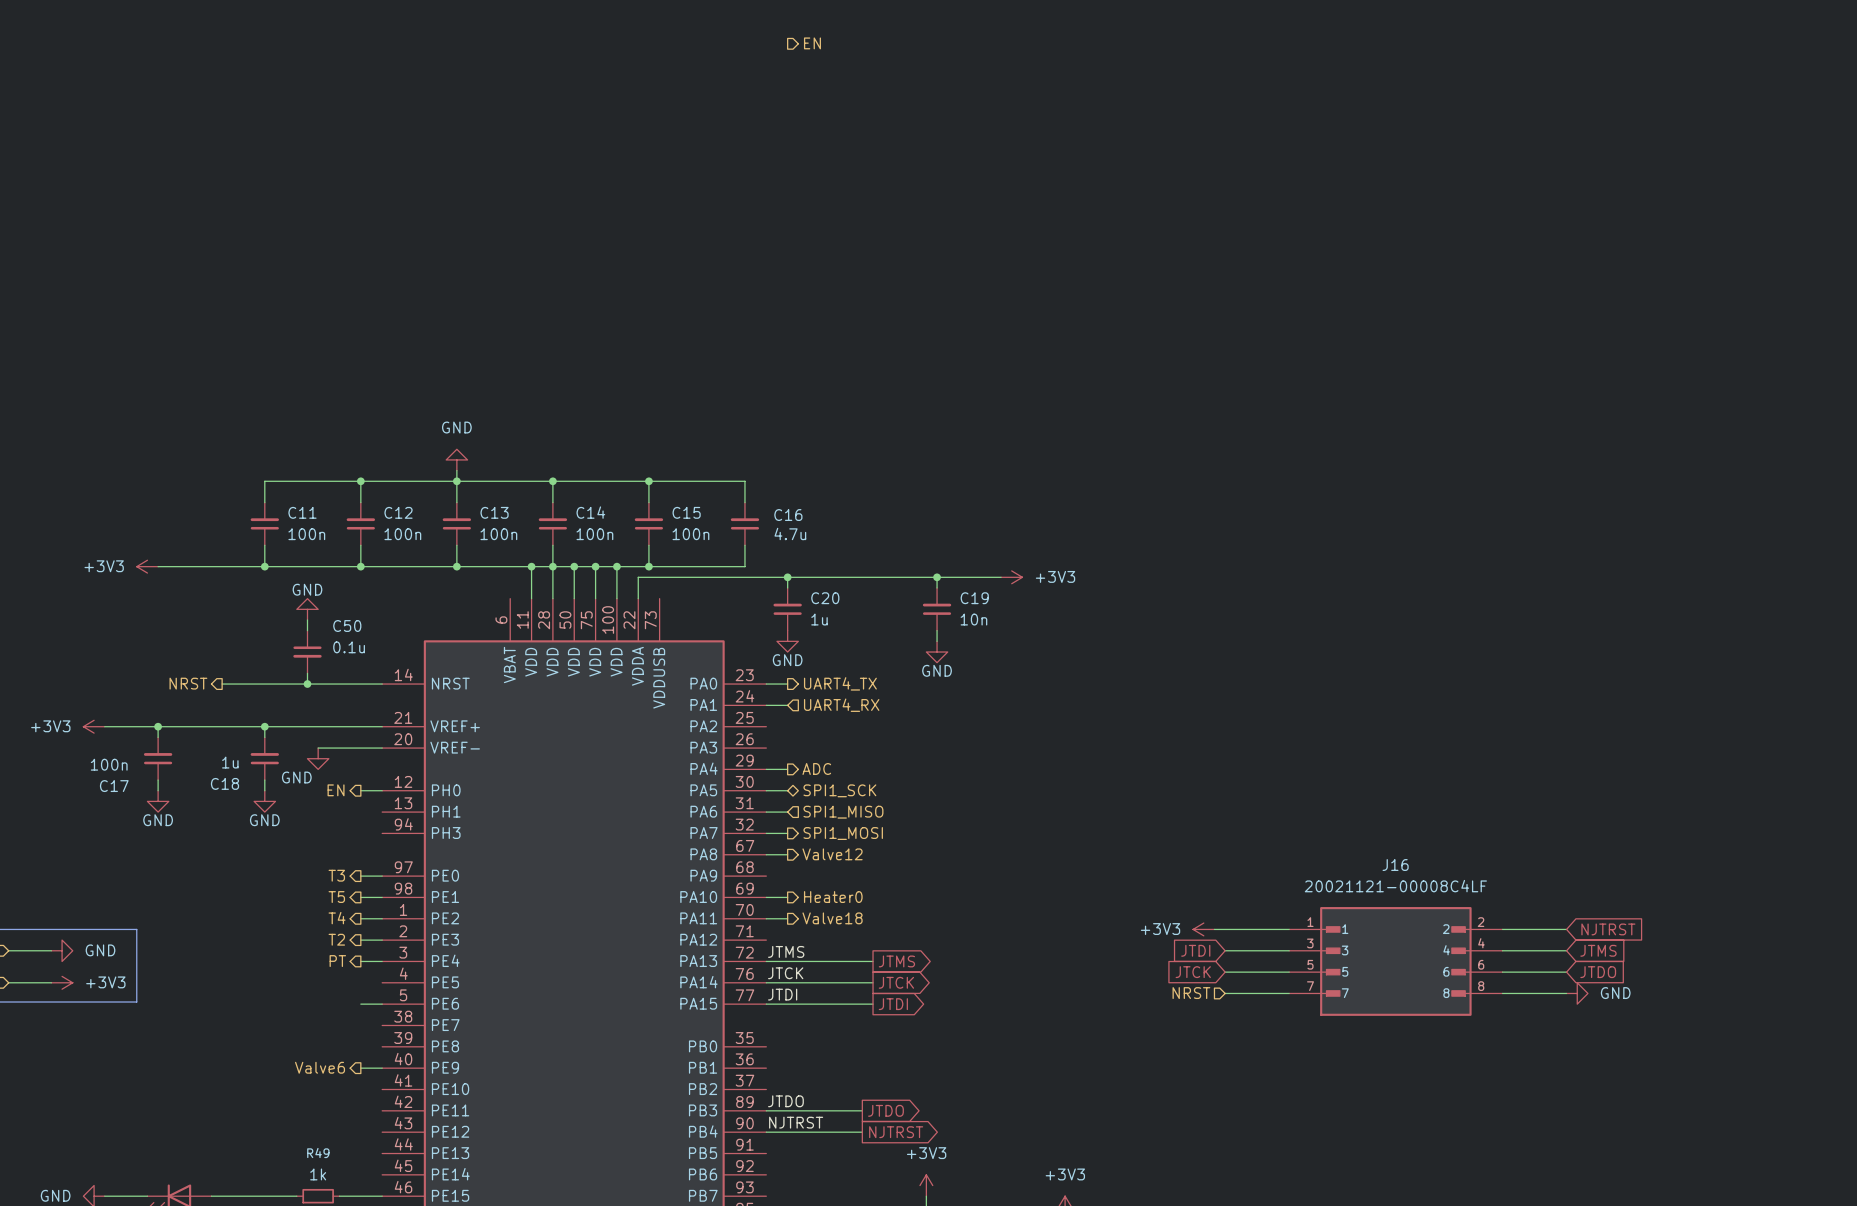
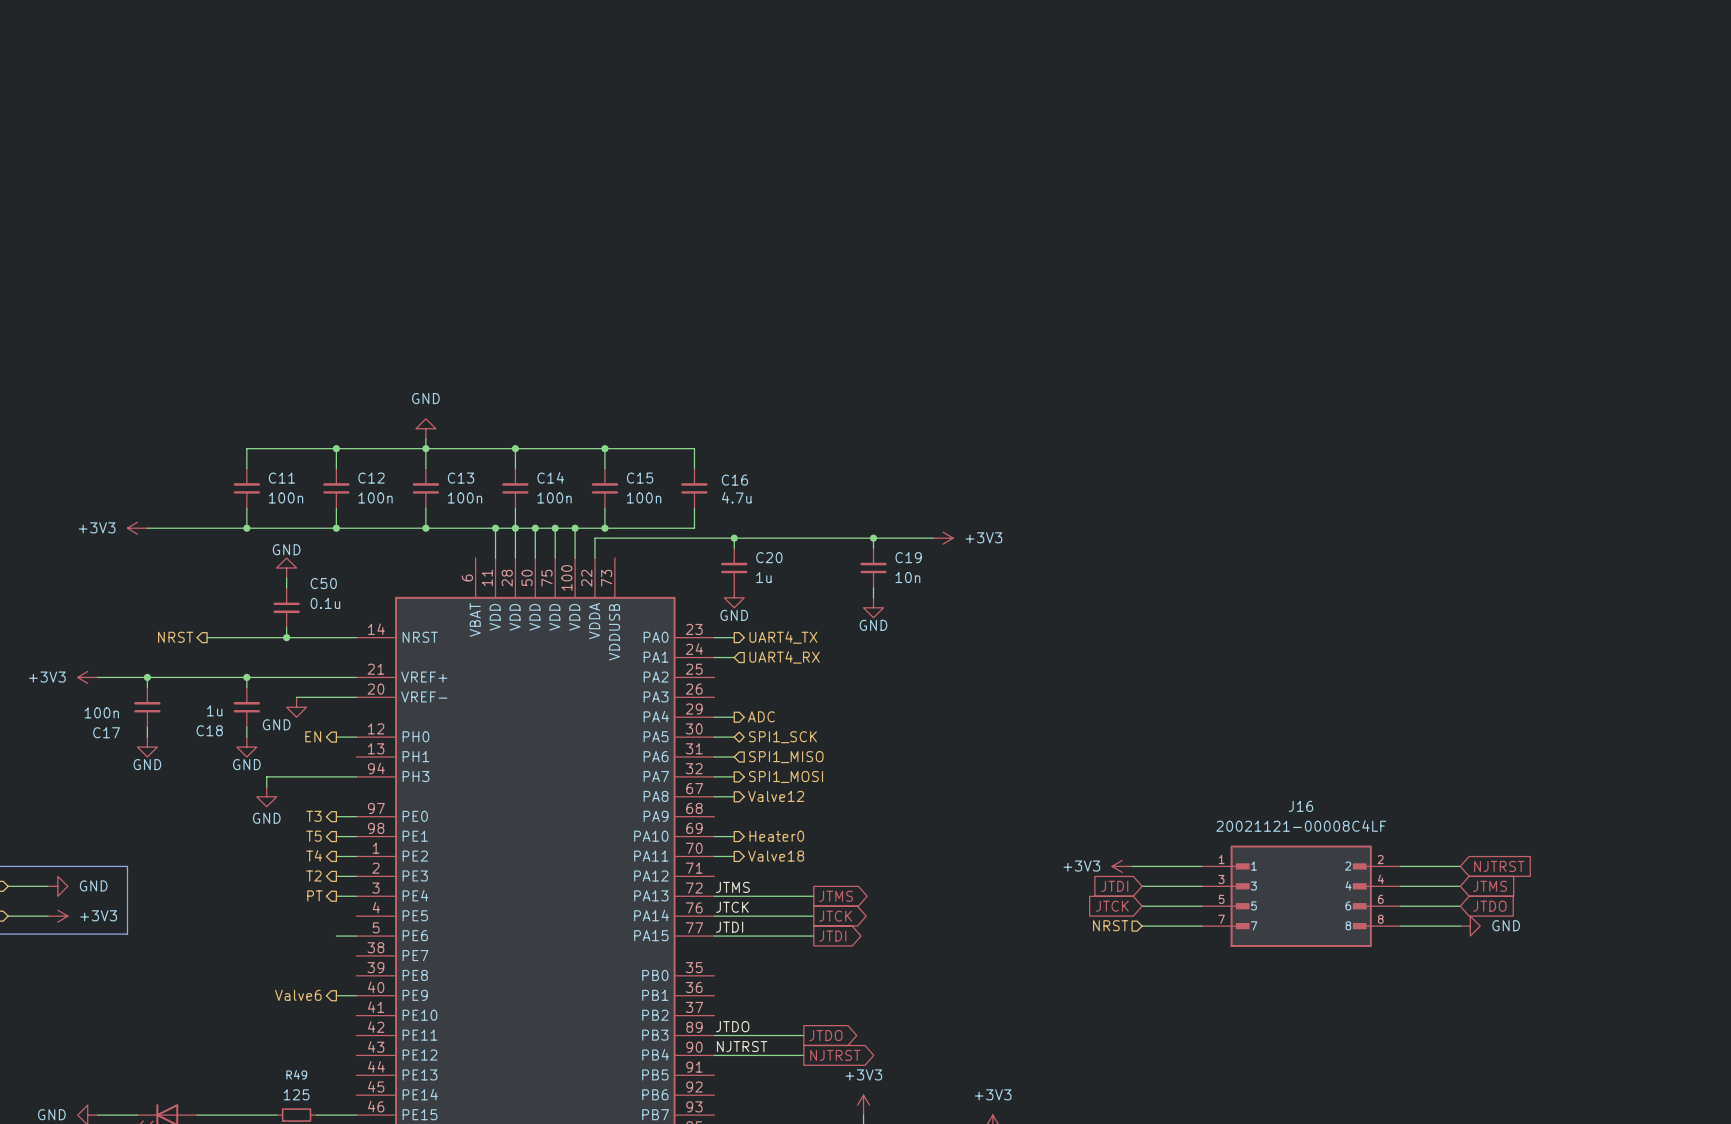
hierarchical label: EN (812, 43) -> none
wire: none -> (356, 776) (266, 776) (266, 786)
power symbol: none -> GND (266, 796)
R49 value: 1k (318, 1174) -> 125 (296, 1094)

